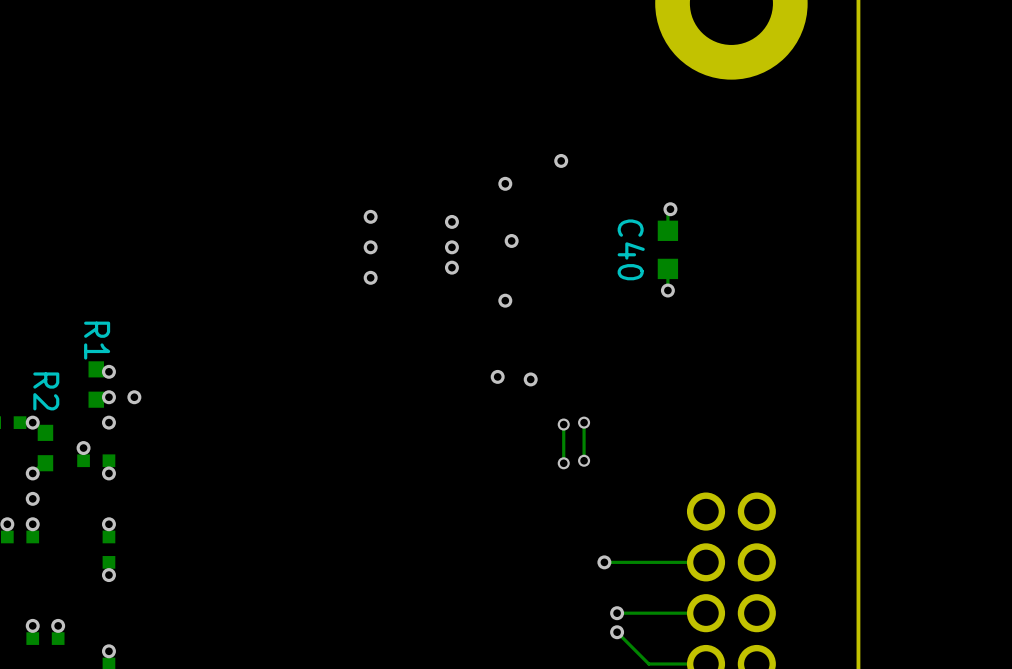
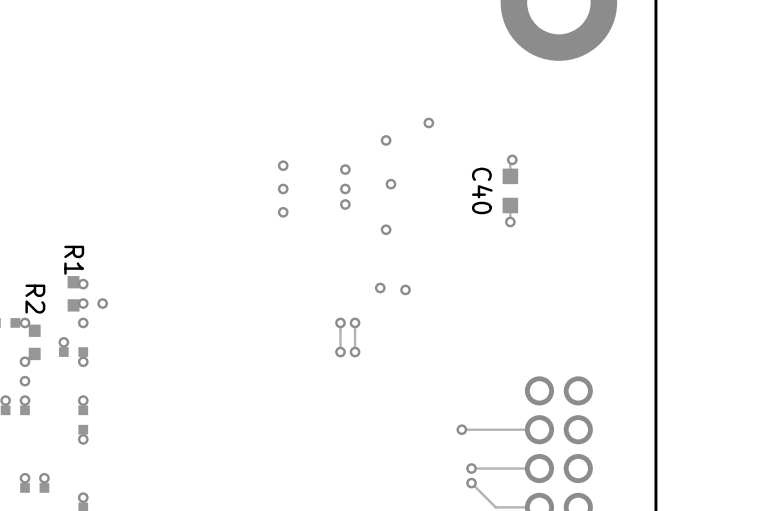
track: none -> (340, 322) (340, 352)
via: none -> (340, 322)
via: none -> (355, 322)
track: (584, 422) (584, 460) -> (355, 322) (355, 352)
via: (584, 422) -> none
track: (563, 424) (563, 463) -> none
via: (563, 424) -> none
via: none -> (340, 352)
via: none -> (355, 352)
via: (584, 460) -> none
via: (563, 463) -> none

